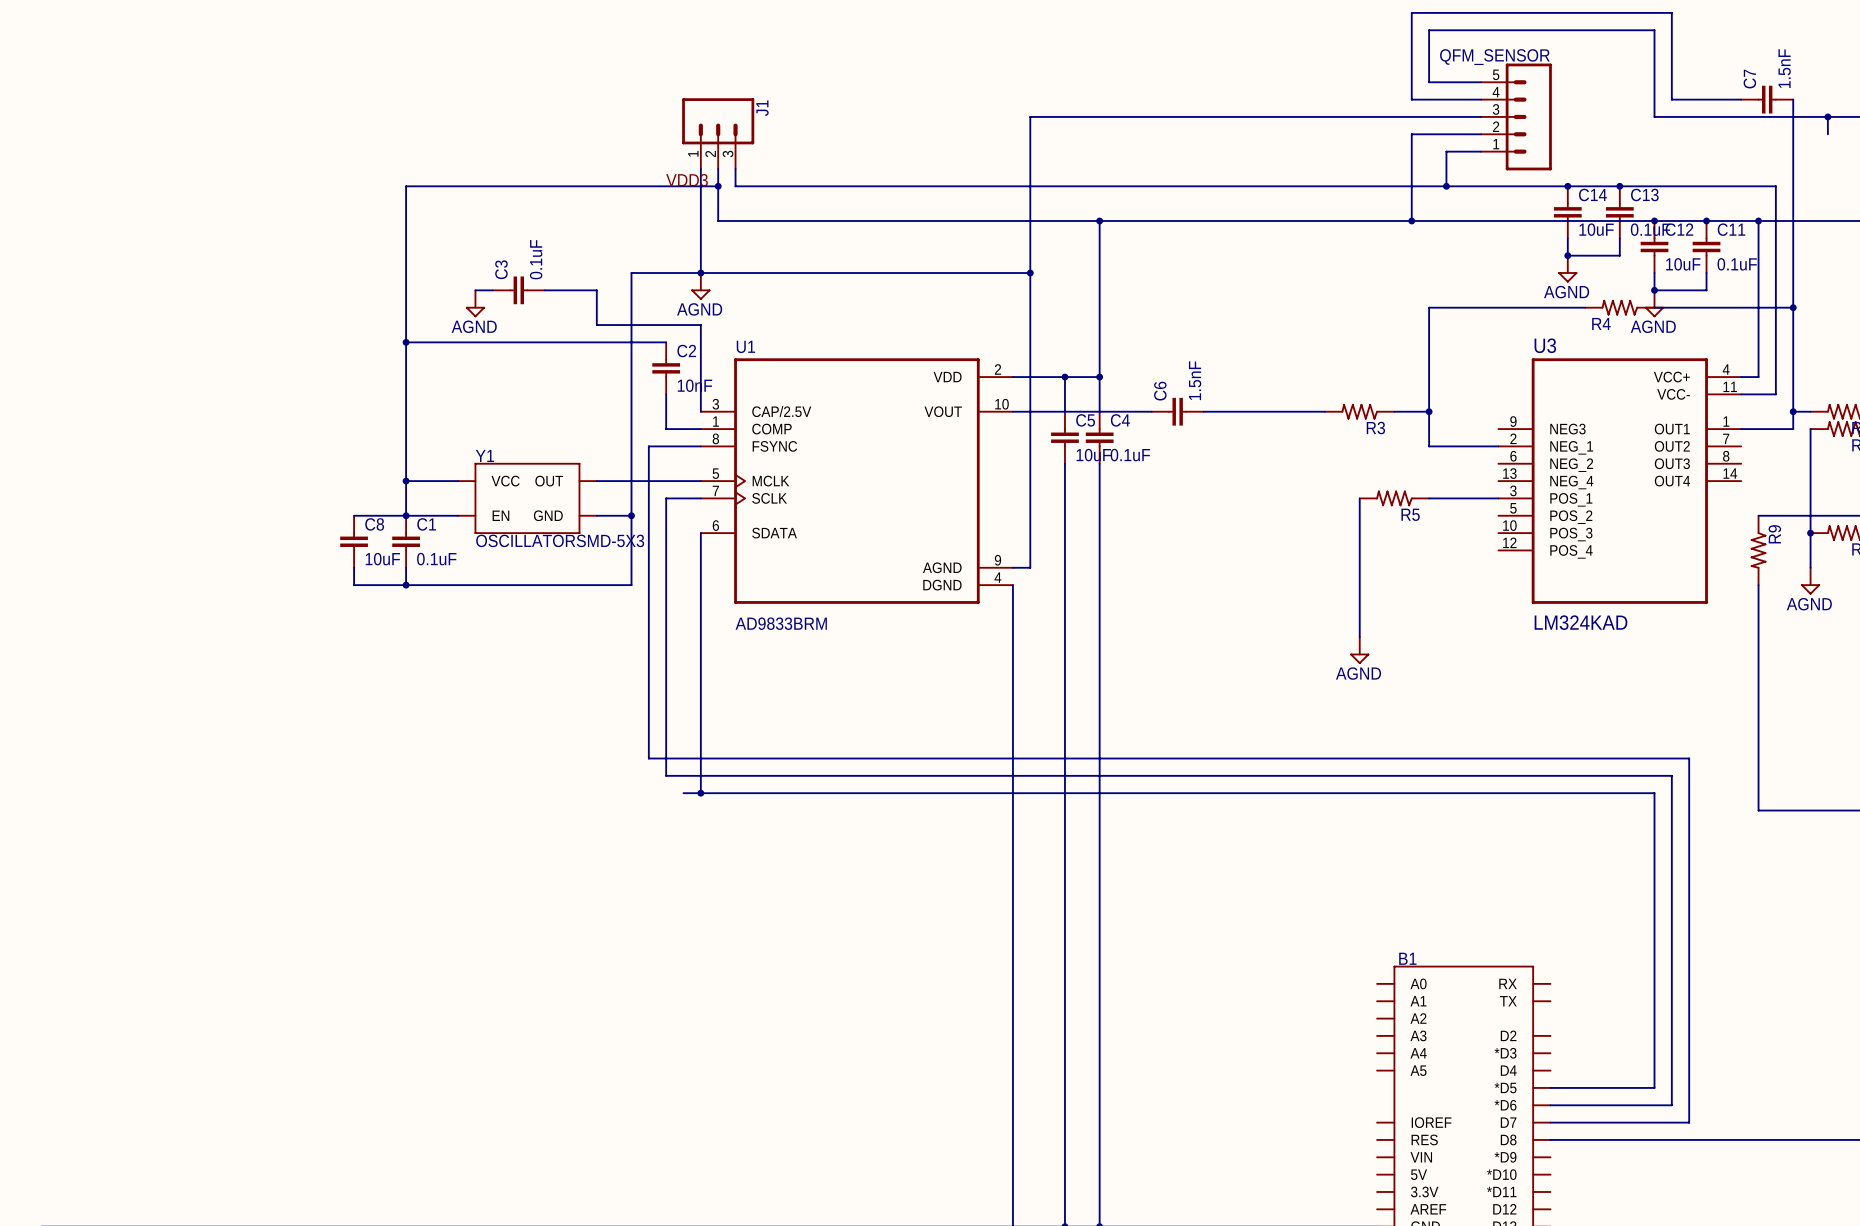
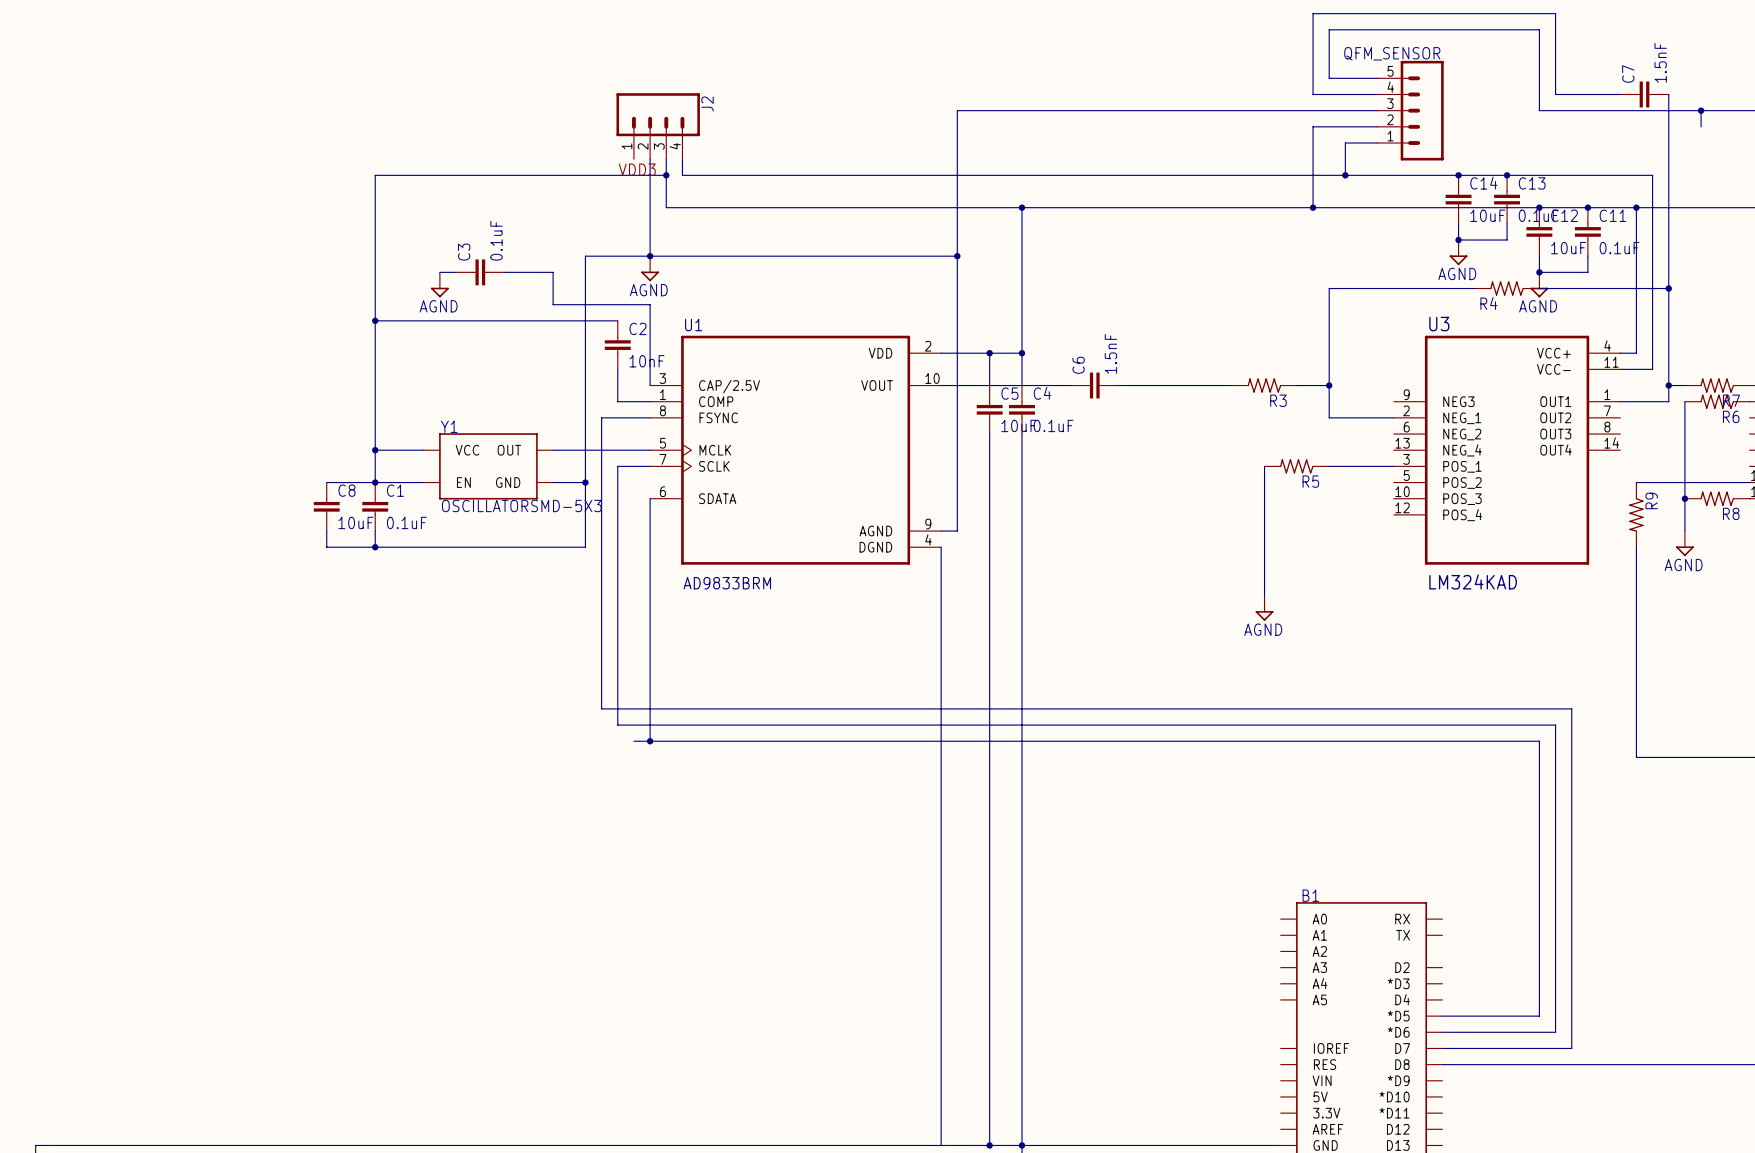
J2: none -> (658, 126)
J1: (718, 133) -> none

